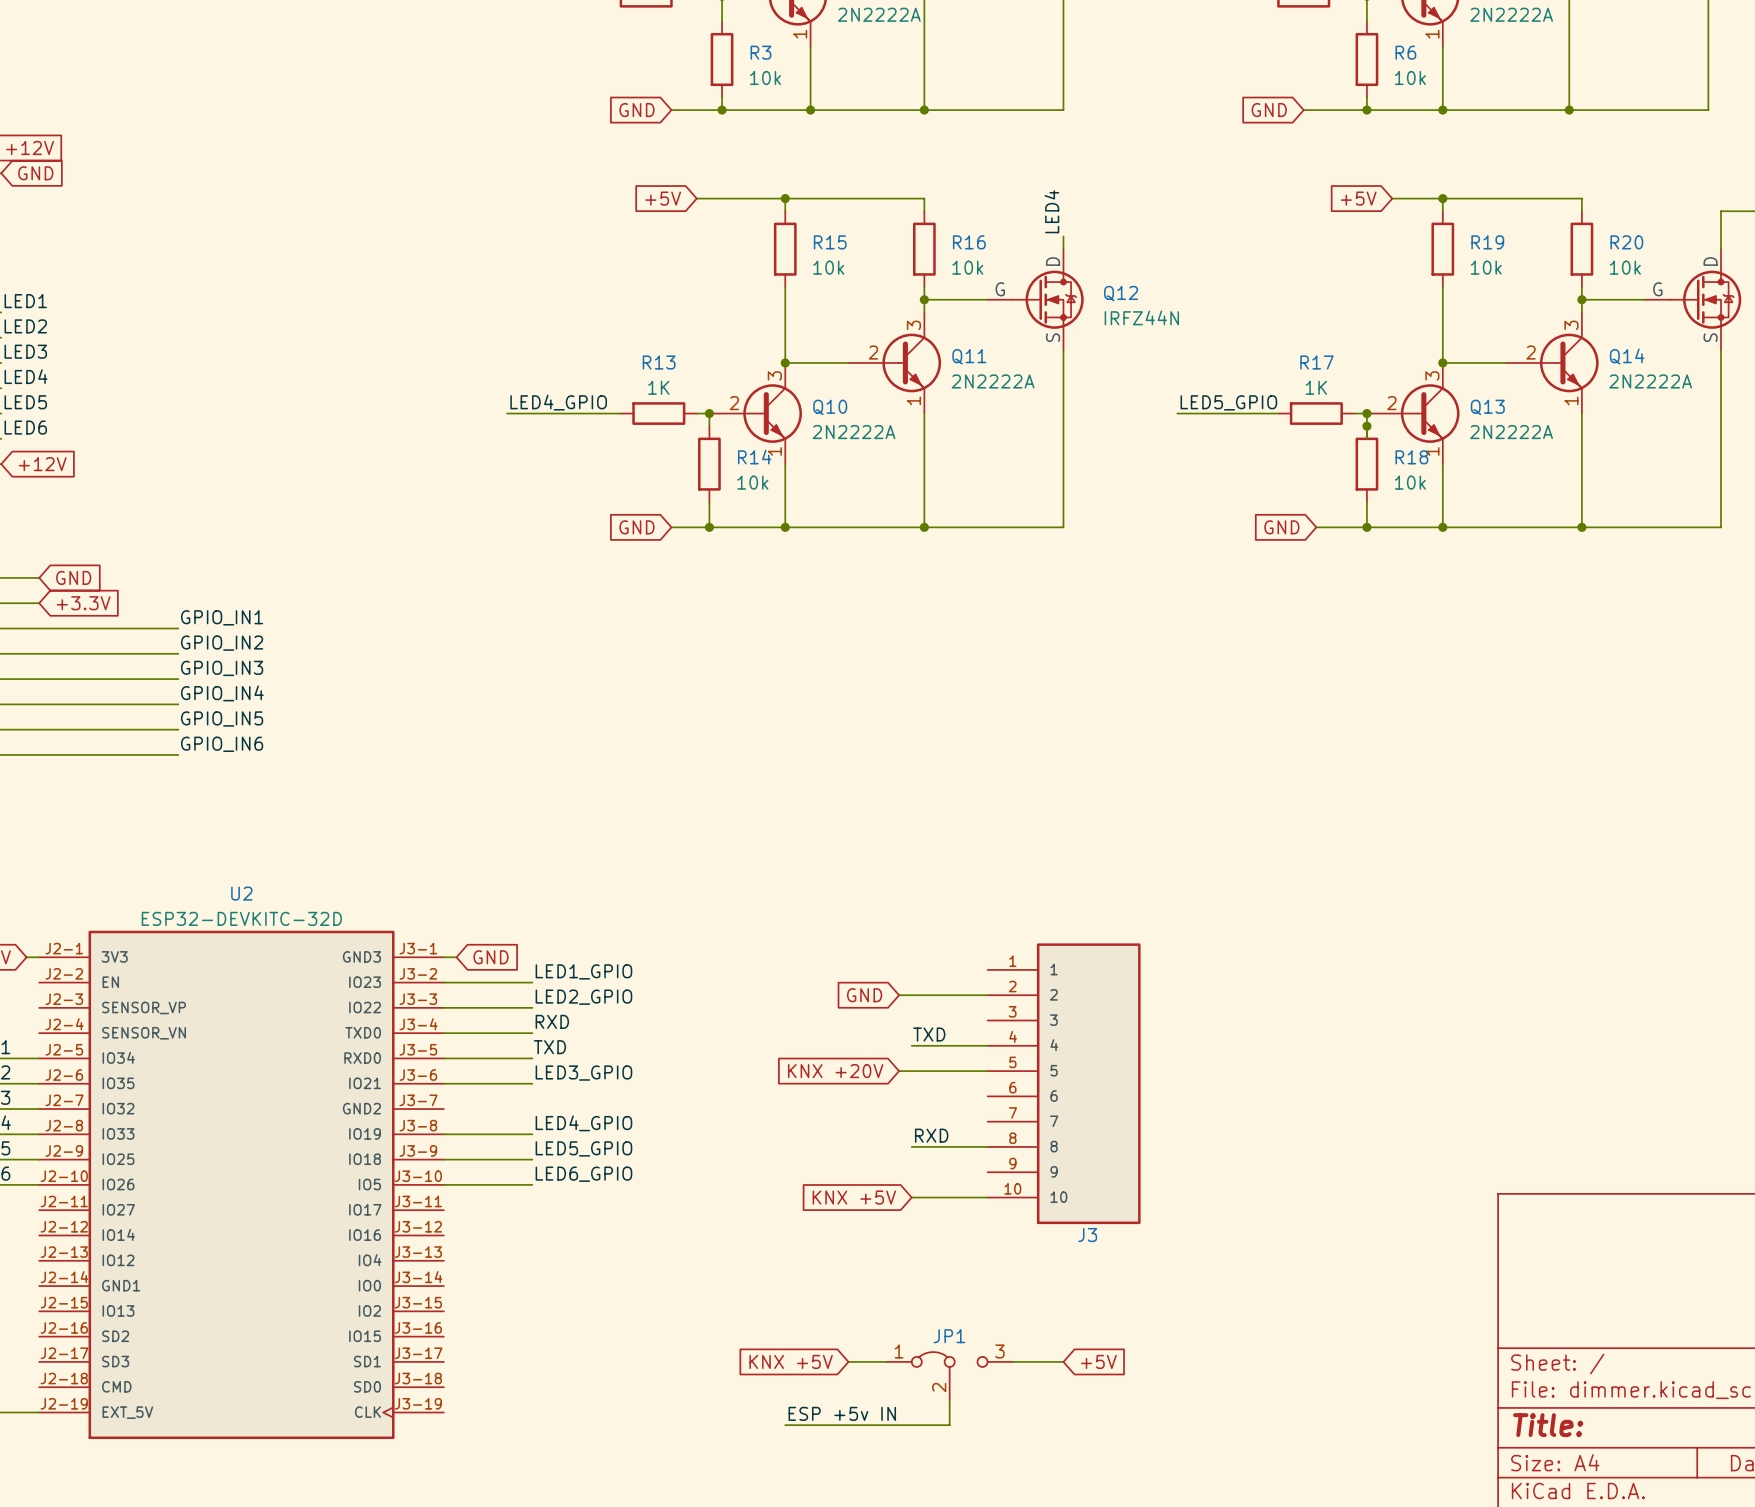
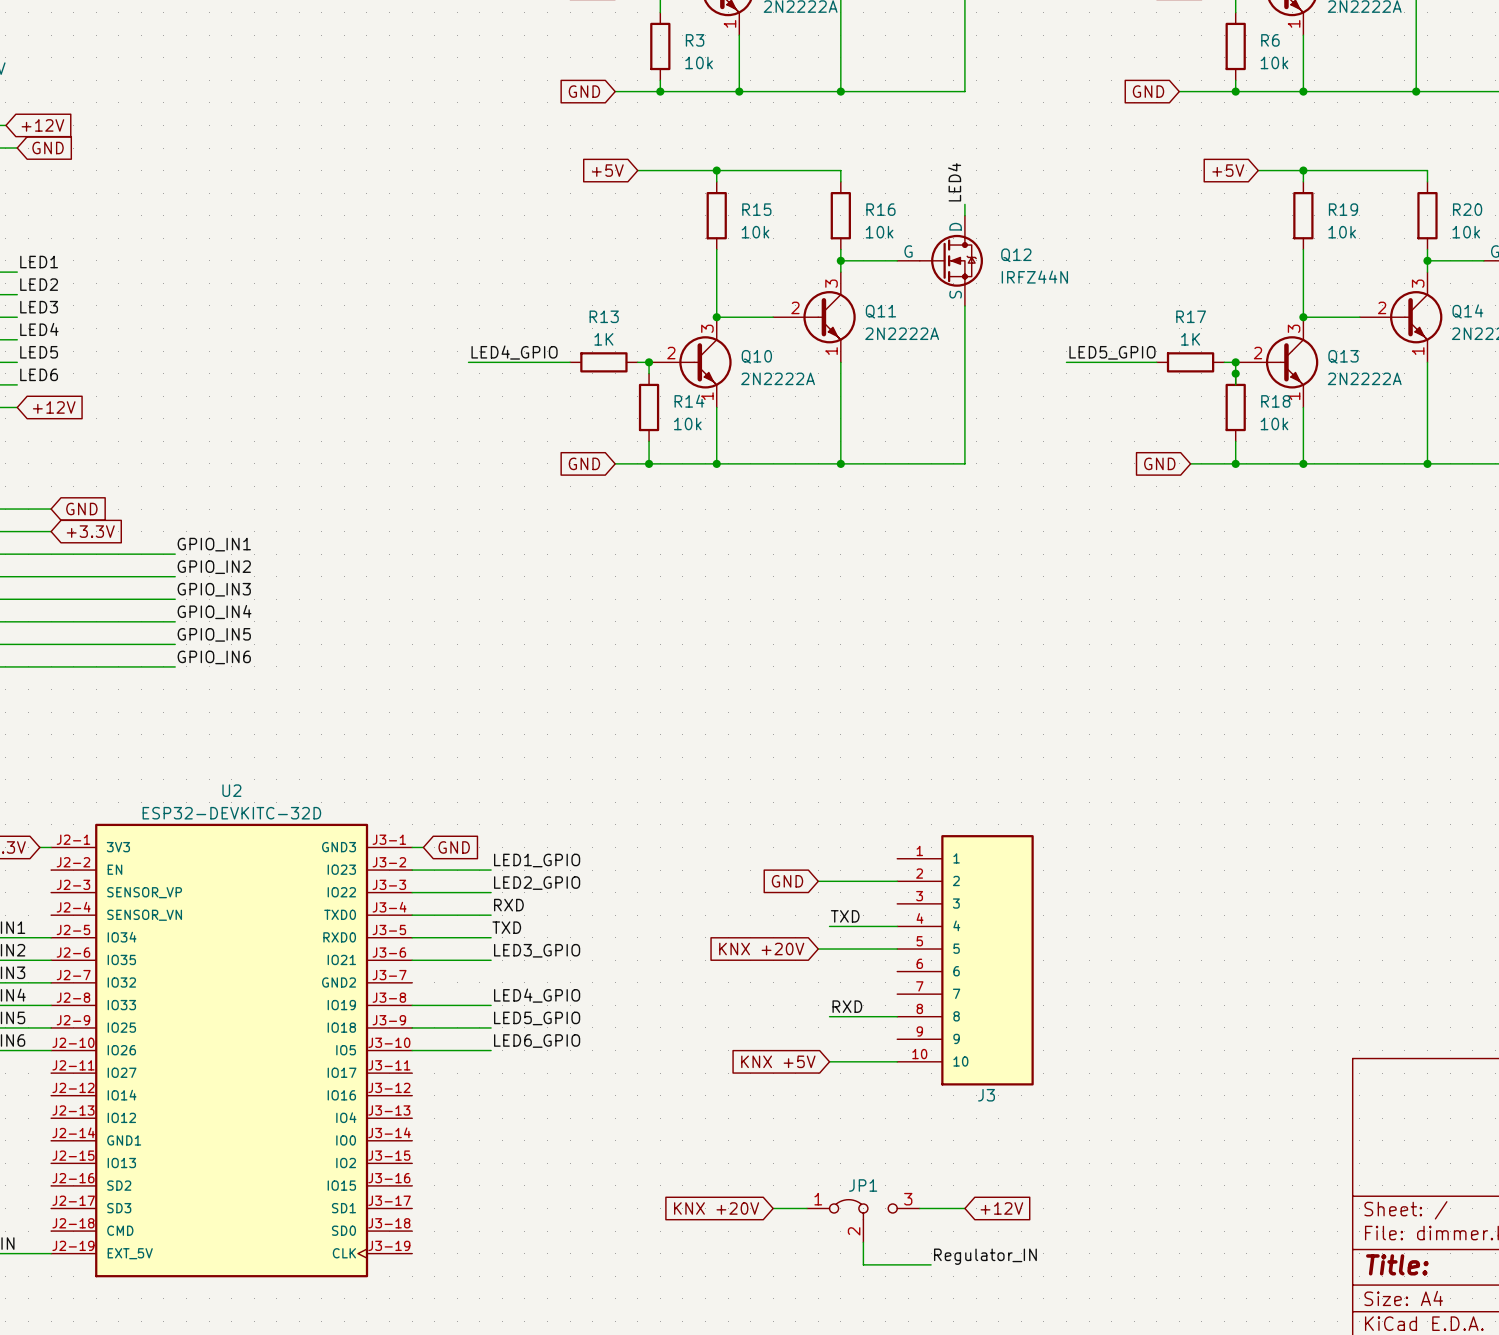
global label: KNX +5V (791, 1361) -> KNX +20V (716, 1208)
global label: +5V (1098, 1361) -> +12V (1001, 1208)
label: ESP +5v IN (842, 1413) -> none
label: none -> Regulator_IN (985, 1256)
wire: (785, 1425) (949, 1425) -> (931, 1264) (863, 1264)

